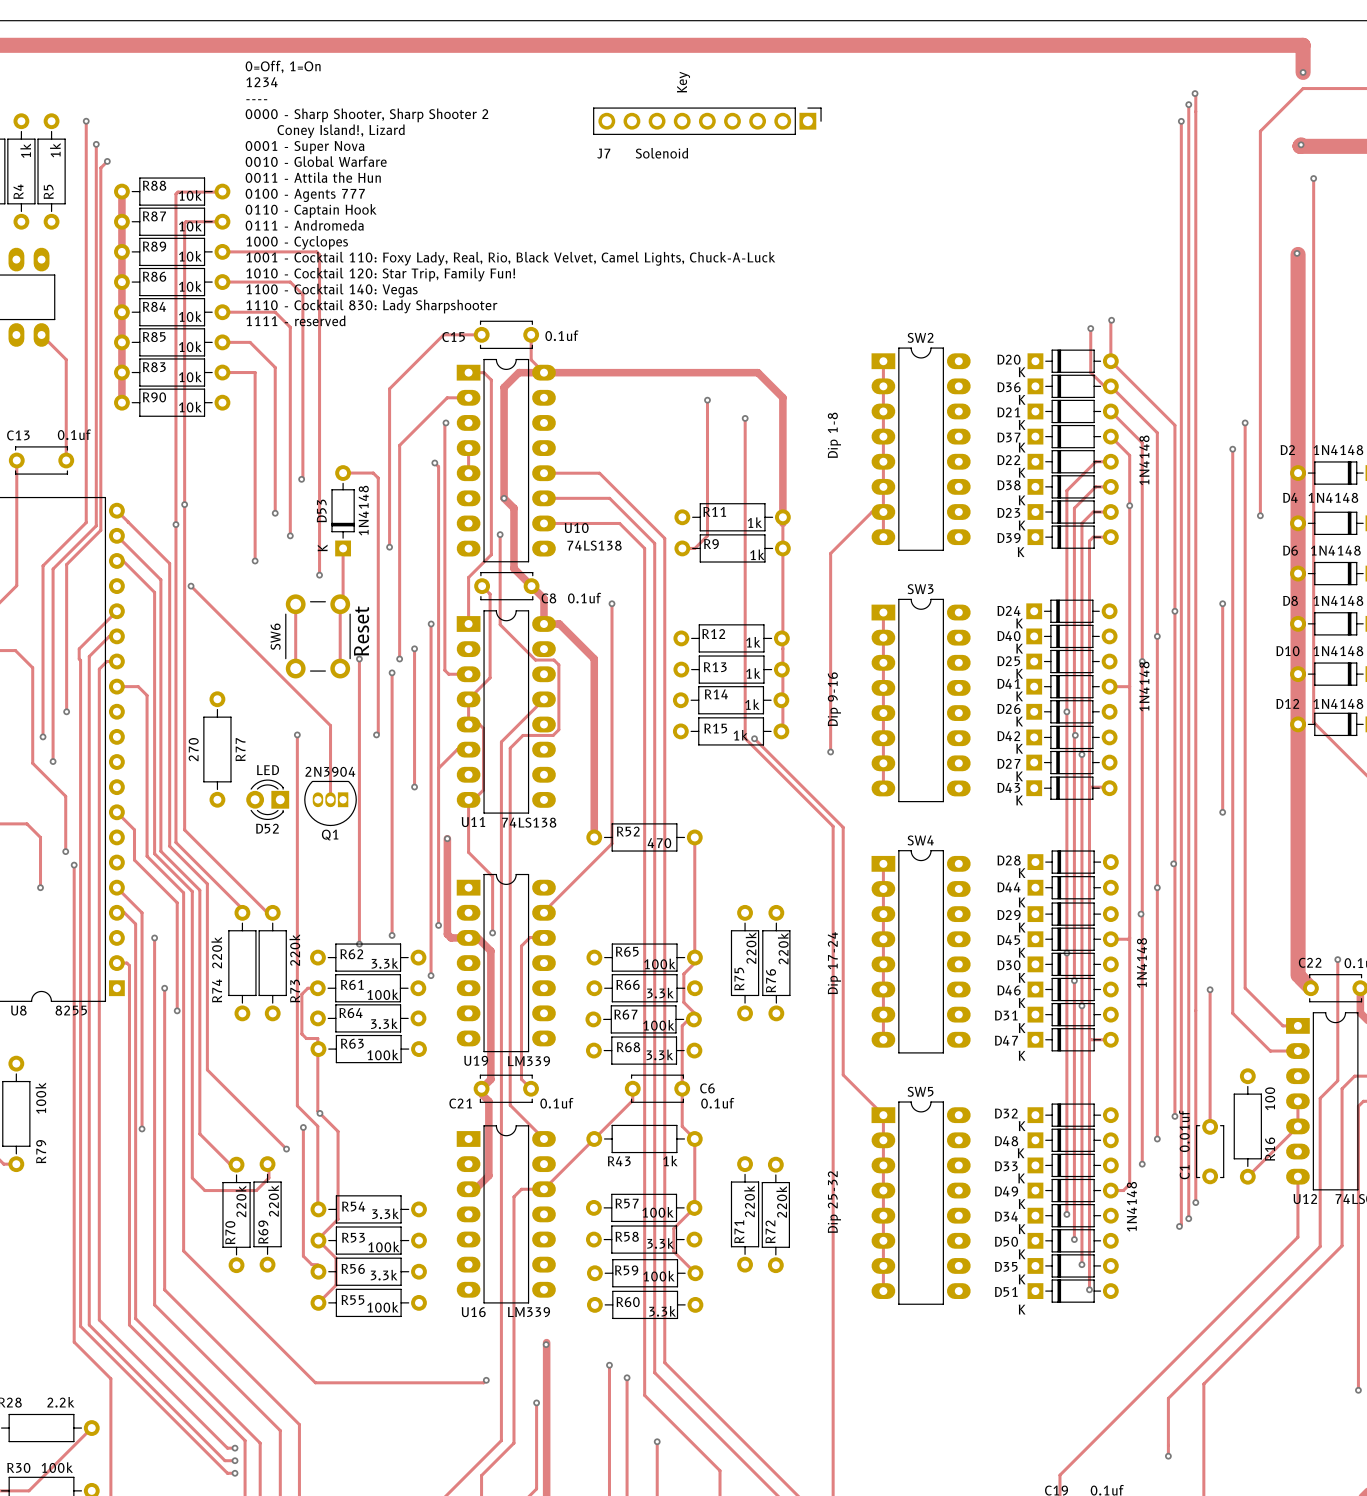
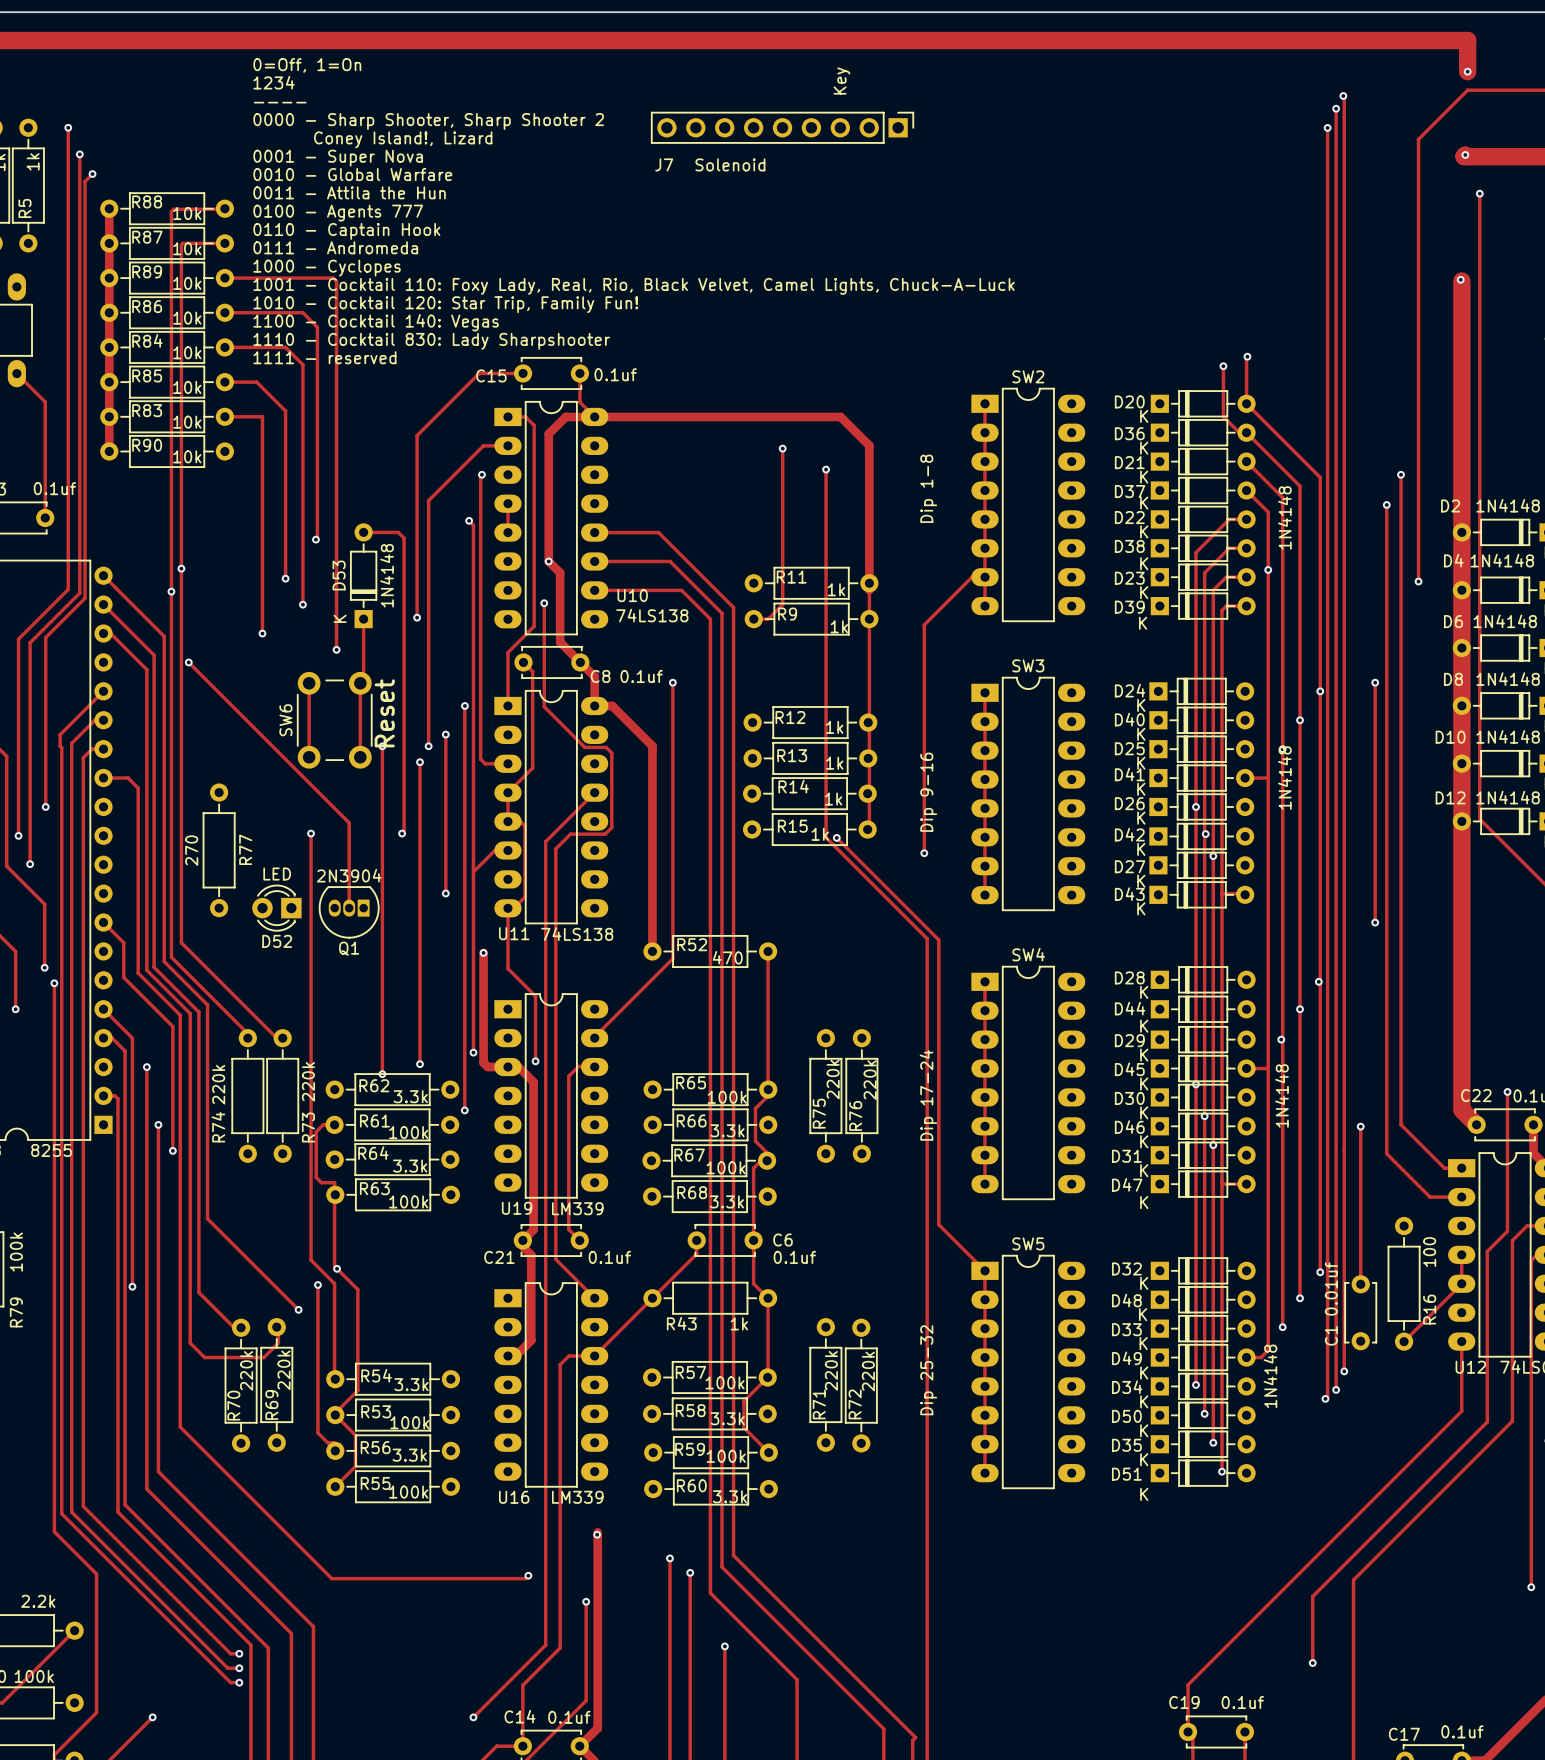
text position: Key (683, 82) -> Key (841, 81)

